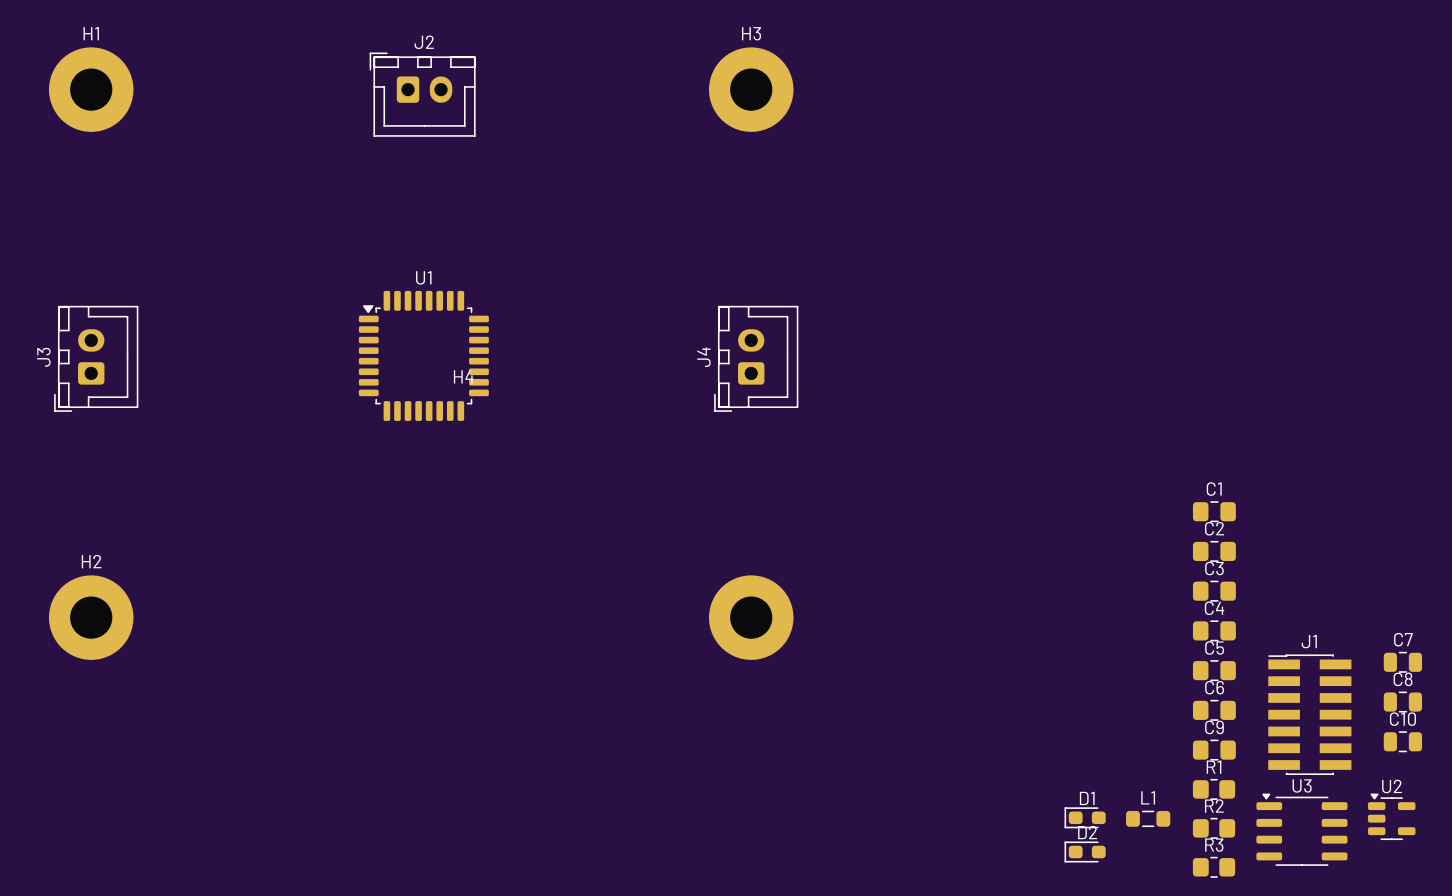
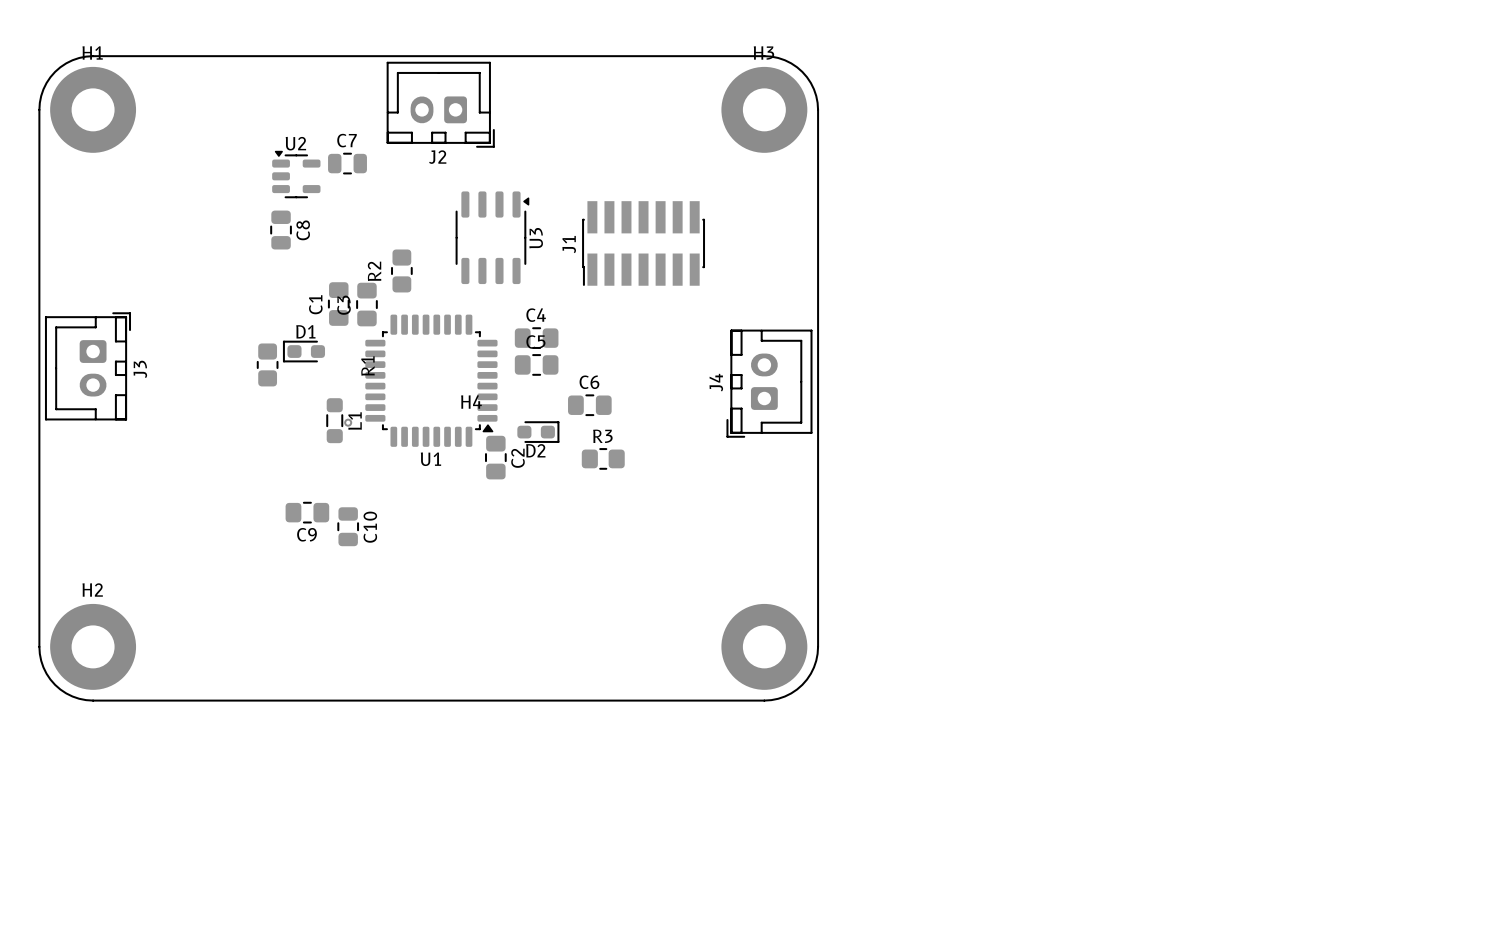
board edge: none -> (93, 56) (764, 56) (784, 60) (802, 71) (813, 89) (818, 109) (818, 646) (813, 667) (802, 684) (784, 696) (764, 700) (93, 700) (72, 696) (55, 684) (43, 667) (39, 646) (39, 109) (43, 89) (55, 71) (72, 60) (93, 56)
J2 rotation: 0° (422, 94) -> 180° (440, 104)
U1 rotation: 0° (423, 355) -> 180° (431, 380)
J3 rotation: 0° (96, 358) -> 180° (87, 366)
via: none -> (348, 422)
C1 name position: C1 (1214, 489) -> C1 (315, 304)
C1 rotation: 0° (1214, 511) -> 90° clockwise (338, 304)
C1 position: (1214, 511) -> (338, 304)
C2 rotation: 0° (1214, 551) -> 90° clockwise (495, 457)
C2 position: (1214, 551) -> (495, 457)
C3 name position: C3 (1214, 568) -> C3 (344, 305)
C3 rotation: 0° (1214, 591) -> 90° clockwise (366, 304)
C3 position: (1214, 591) -> (366, 304)
C4 position: (1214, 630) -> (536, 338)
C7 position: (1402, 662) -> (347, 163)
C5 position: (1214, 670) -> (536, 364)
C8 rotation: 0° (1402, 702) -> 90° clockwise (281, 230)
C8 position: (1402, 702) -> (281, 230)
C6 position: (1214, 710) -> (589, 405)
J1 rotation: 0° (1309, 714) -> 90° counterclockwise (643, 243)
J1 position: (1309, 714) -> (643, 243)
C9 name position: C9 (1214, 727) -> C9 (307, 534)
C10 rotation: 0° (1402, 741) -> 90° clockwise (348, 526)
C10 position: (1402, 741) -> (348, 526)
C9 position: (1214, 750) -> (307, 512)
R1 name position: R1 (1214, 767) -> R1 (367, 366)
R1 rotation: 0° (1214, 789) -> 90° clockwise (267, 364)
R1 position: (1214, 789) -> (267, 364)
R2 name position: R2 (1214, 806) -> R2 (374, 271)
U2 position: (1391, 816) -> (296, 174)
D1 position: (1085, 817) -> (304, 351)
L1 rotation: 0° (1148, 818) -> 90° clockwise (334, 420)
L1 position: (1148, 818) -> (334, 420)
R2 rotation: 0° (1214, 828) -> 90° clockwise (401, 270)
R2 position: (1214, 828) -> (401, 270)
U3 rotation: 0° (1301, 829) -> 90° clockwise (492, 237)
U3 position: (1301, 829) -> (492, 237)
D2 rotation: 0° (1085, 851) -> 180° (538, 432)
D2 position: (1085, 851) -> (538, 432)
R3 position: (1214, 867) -> (603, 458)

